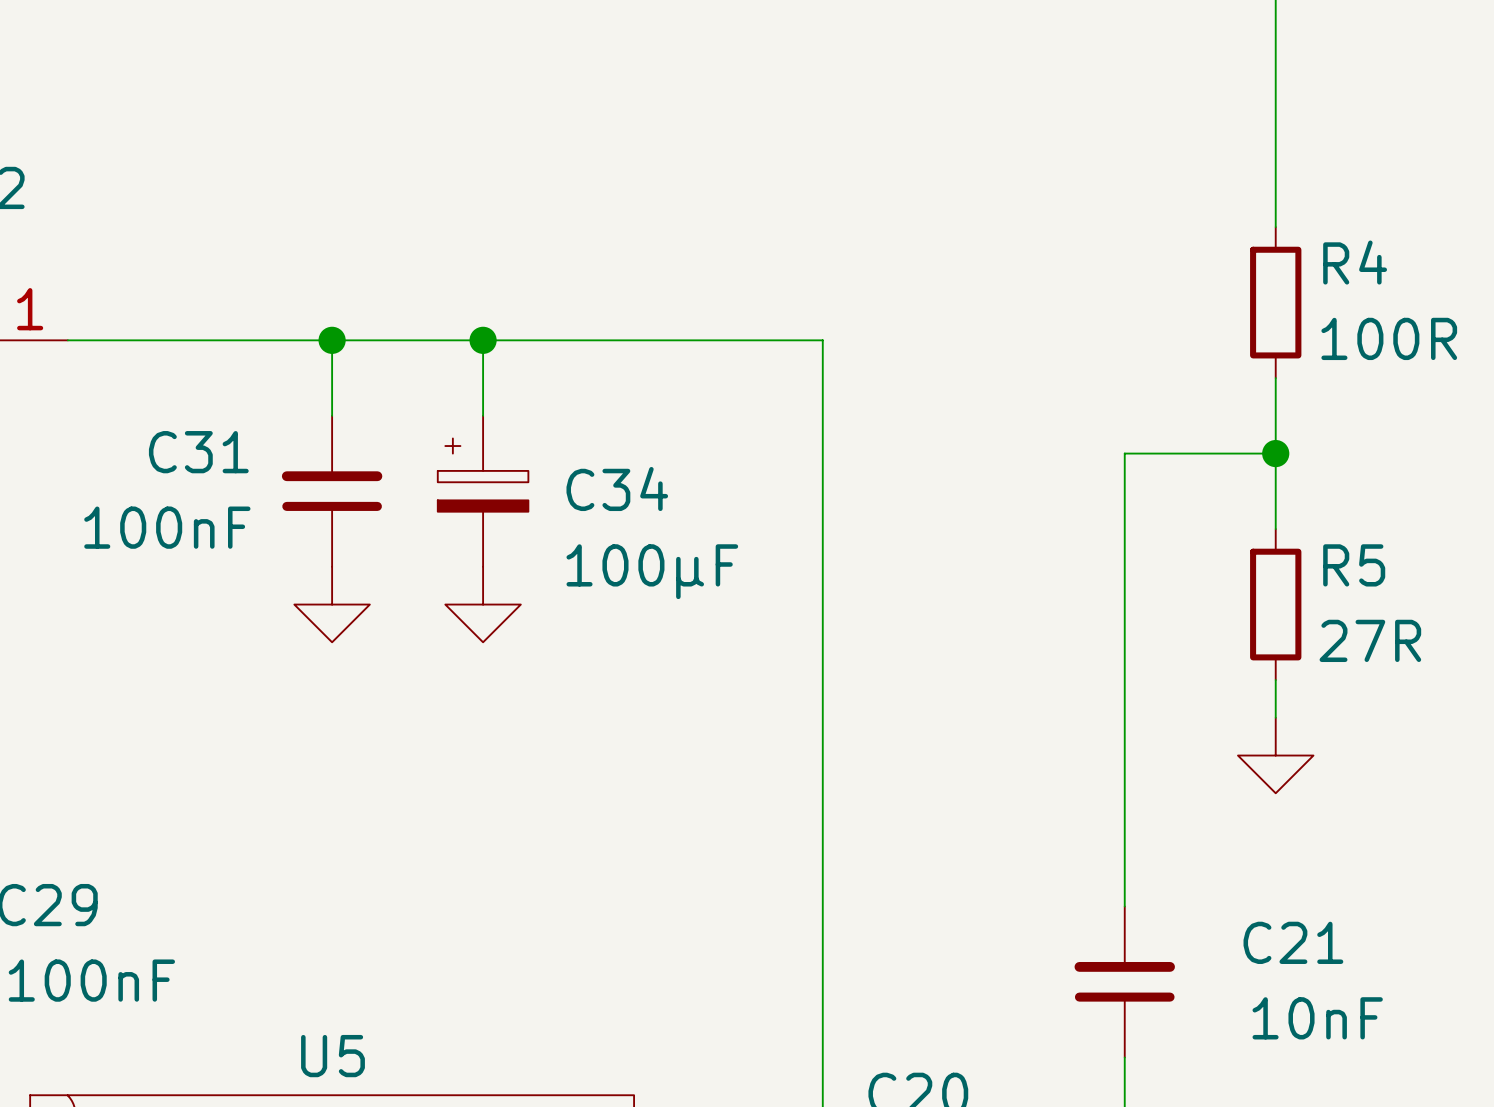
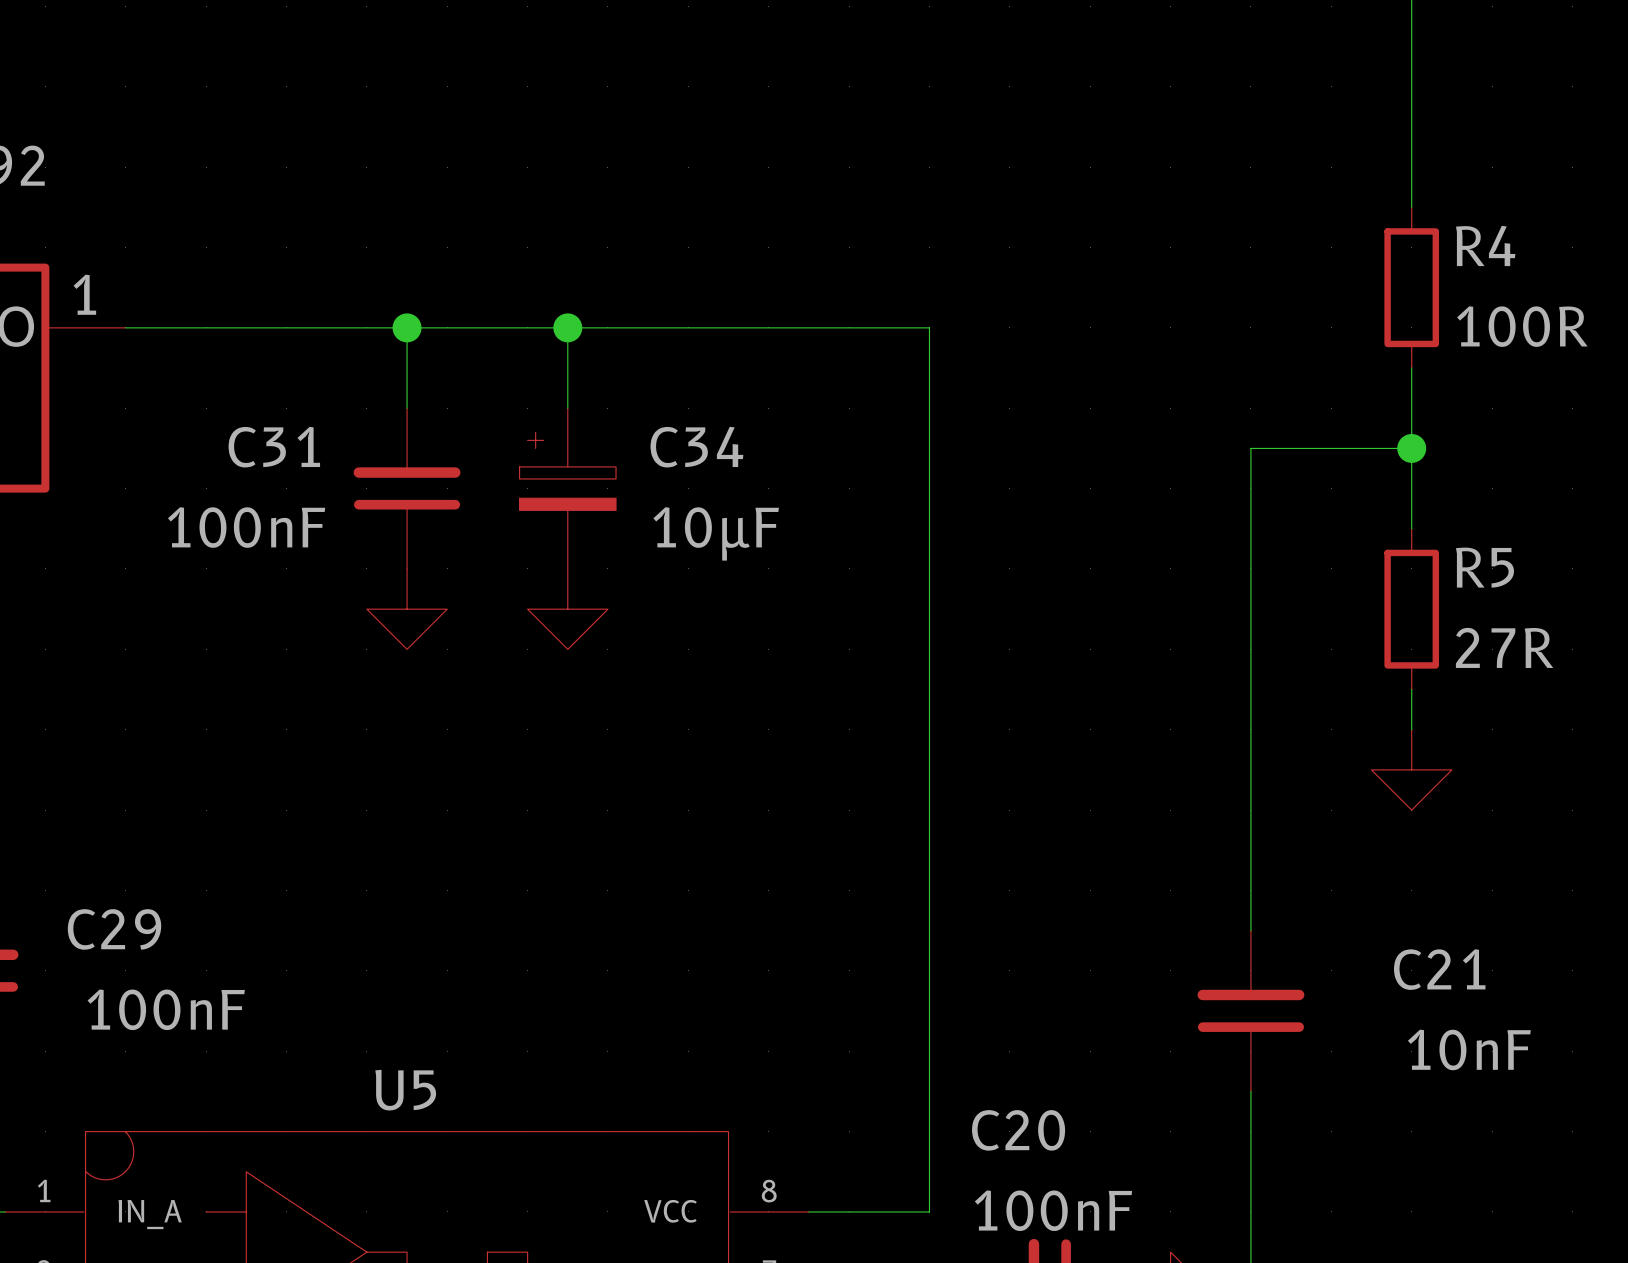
C34 name position: C34 (617, 489) -> C34 (696, 447)
C34 value: 100µF (652, 571) -> 10µF (716, 533)

